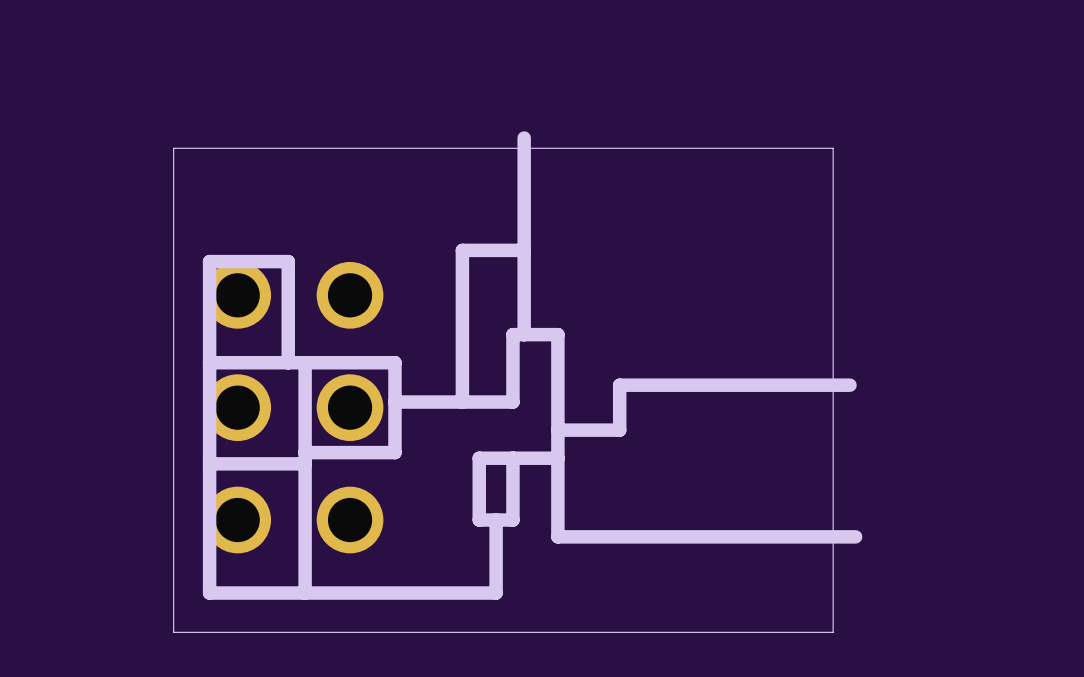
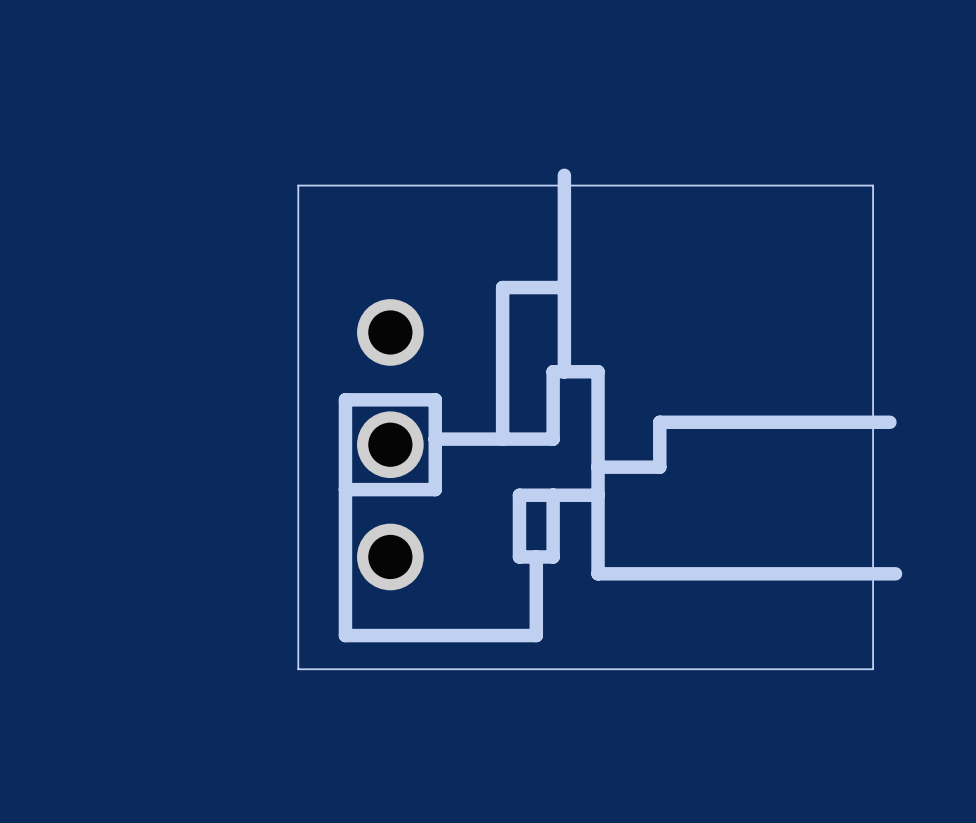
board edge: (257, 148) (173, 148) (173, 632) (257, 632) -> (298, 185) (298, 669)
board edge: (288, 362) (288, 261) (209, 261) (209, 593) (496, 593) -> (345, 629) (345, 635) (536, 635) (536, 629)
board edge: (305, 362) (209, 362) -> none
part: (237, 407) -> none
board edge: (305, 463) (209, 463) -> none

